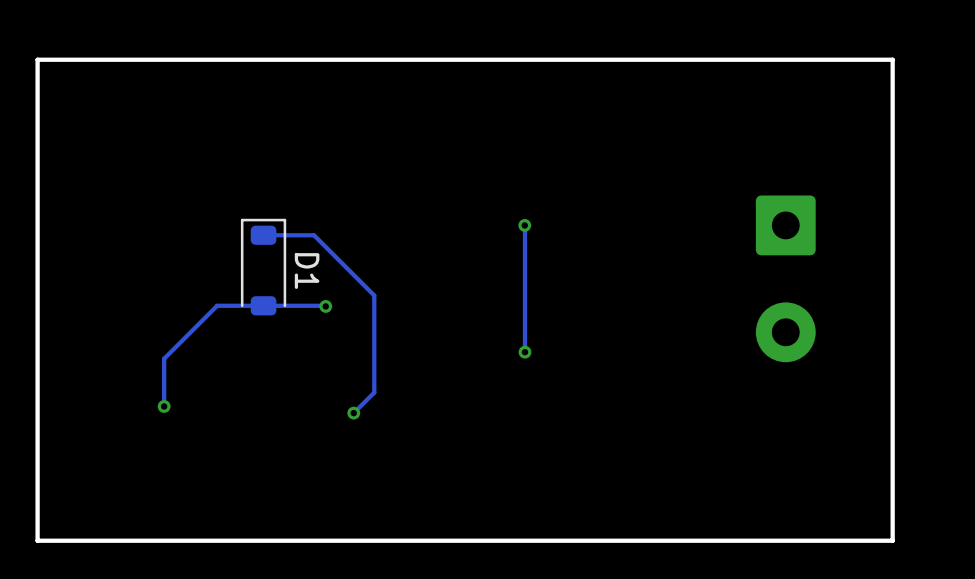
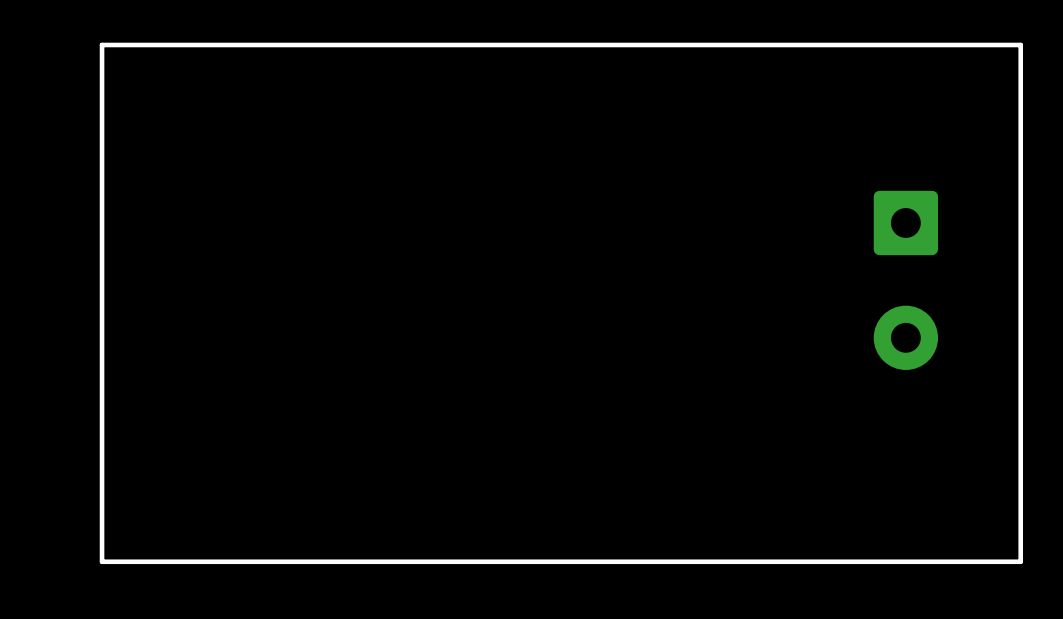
track: (524, 225) (524, 352) -> none
via: (524, 225) -> none
track: (263, 235) (314, 235) (374, 295) (374, 392) (353, 413) -> none
D1: (263, 267) -> none
track: (325, 306) (217, 305) (164, 358) (164, 406) -> none
via: (325, 306) -> none
via: (524, 352) -> none
via: (164, 406) -> none
via: (353, 413) -> none

